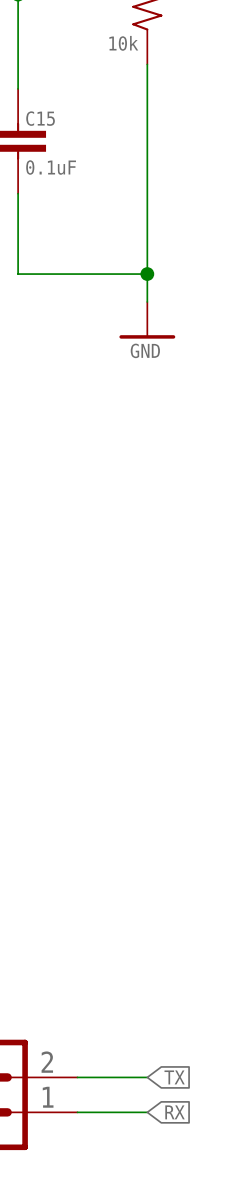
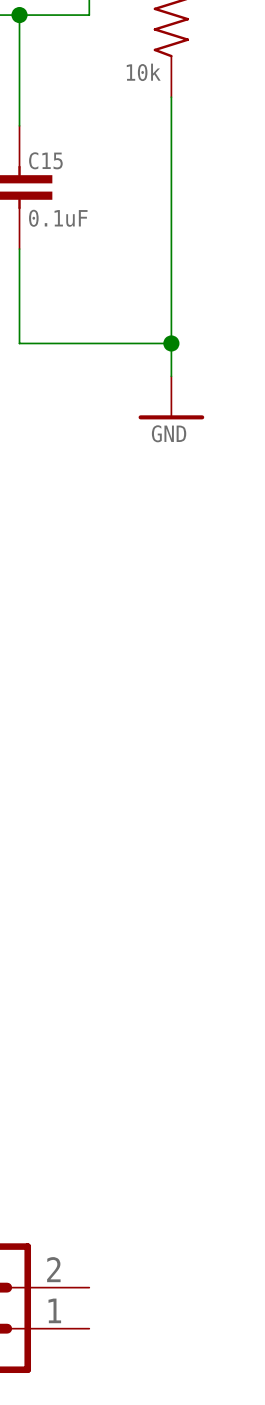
wire: (77, 1077) (147, 1077) -> none
global label: TX (174, 1077) -> none
wire: (77, 1112) (147, 1112) -> none
global label: RX (175, 1112) -> none

